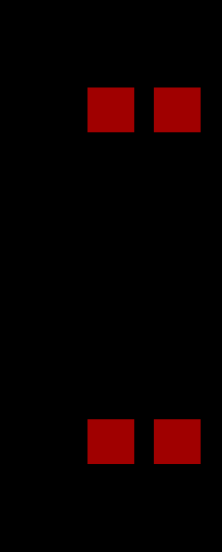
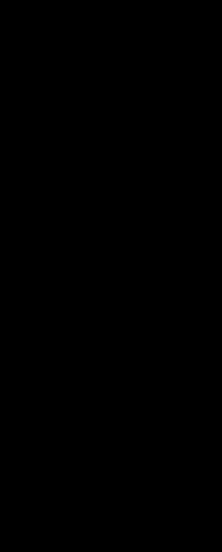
part: (144, 109) -> none
part: (144, 441) -> none

